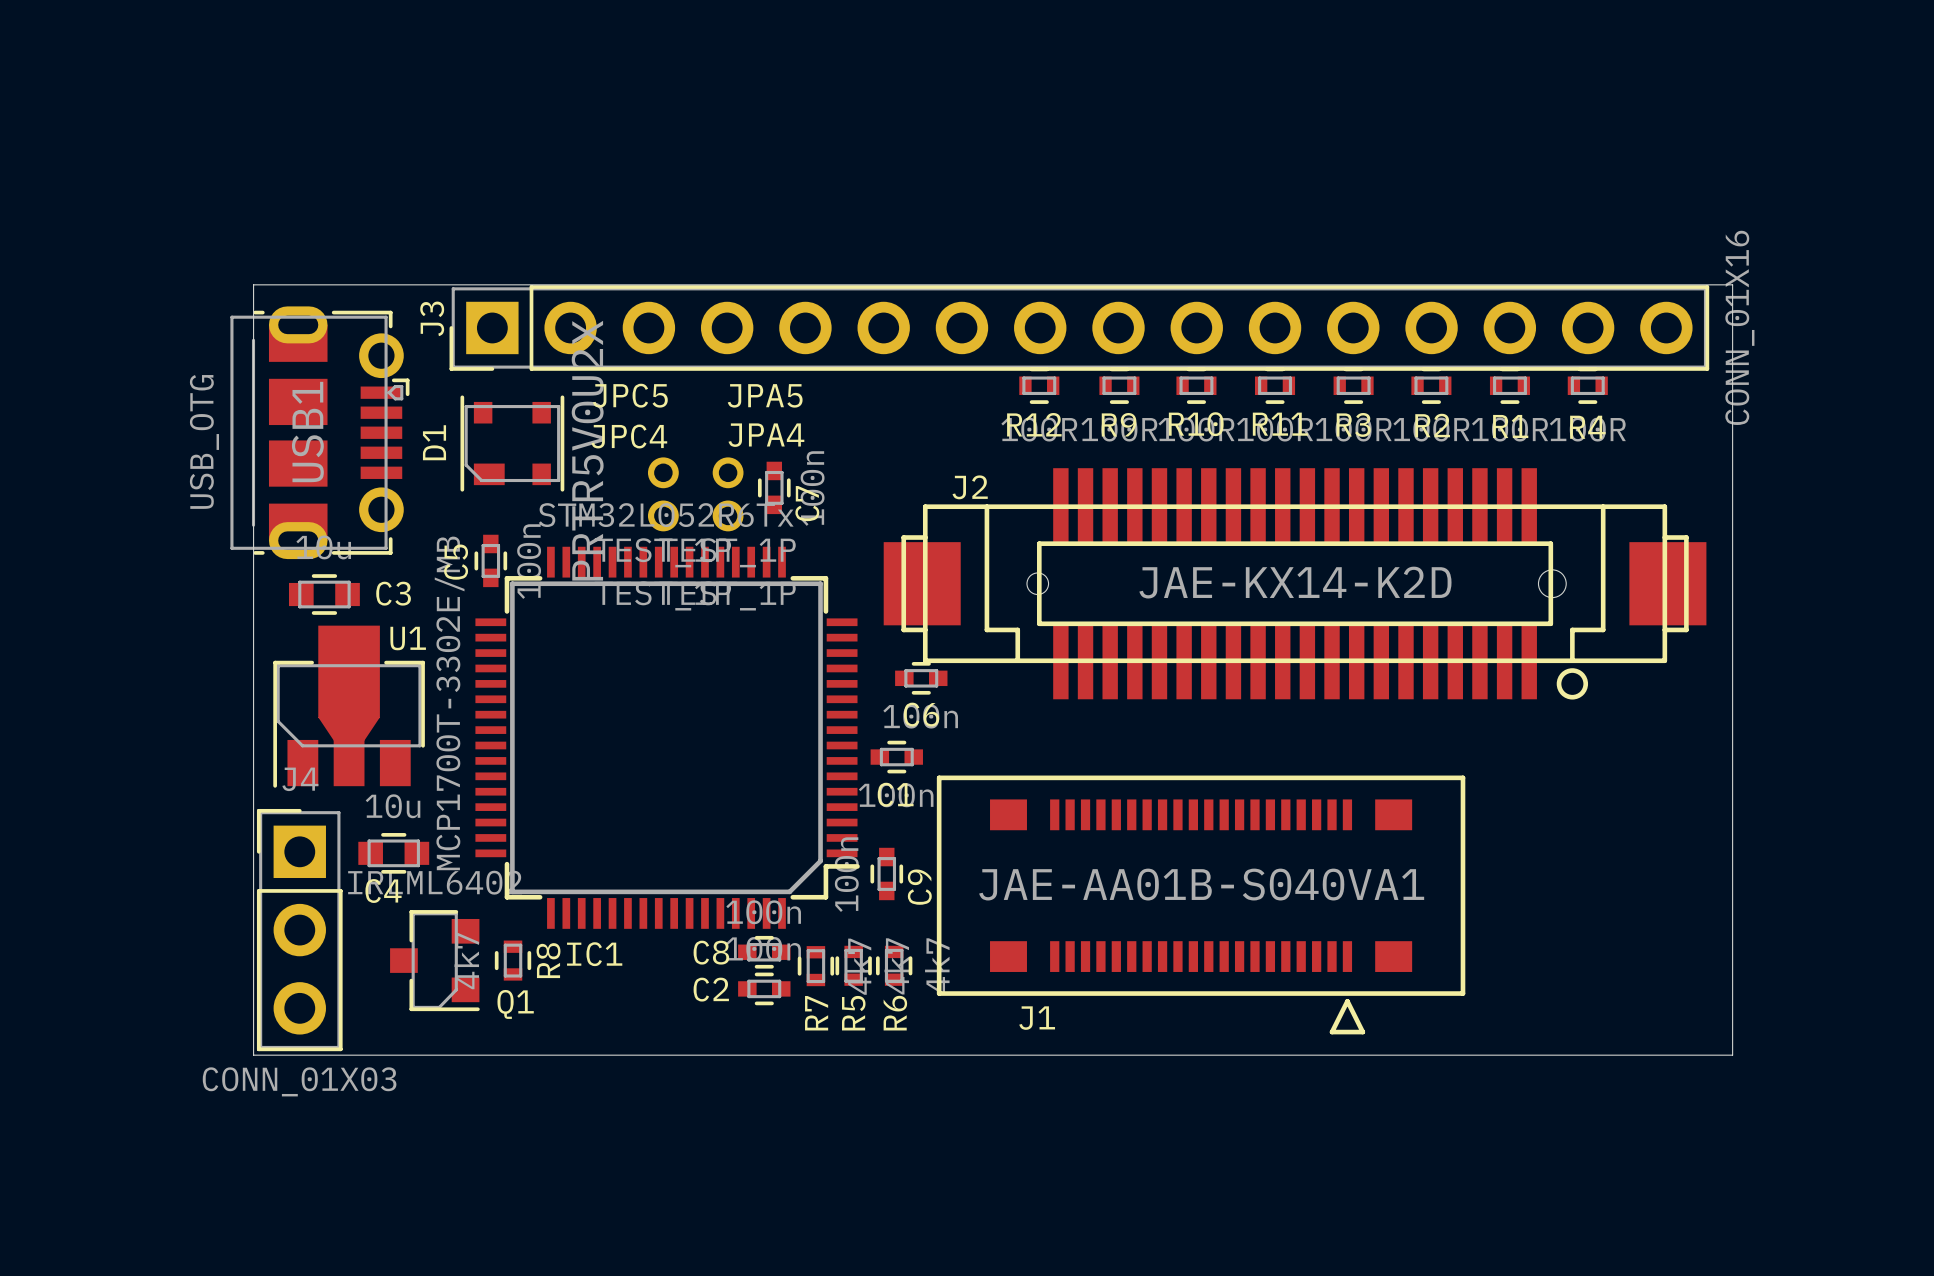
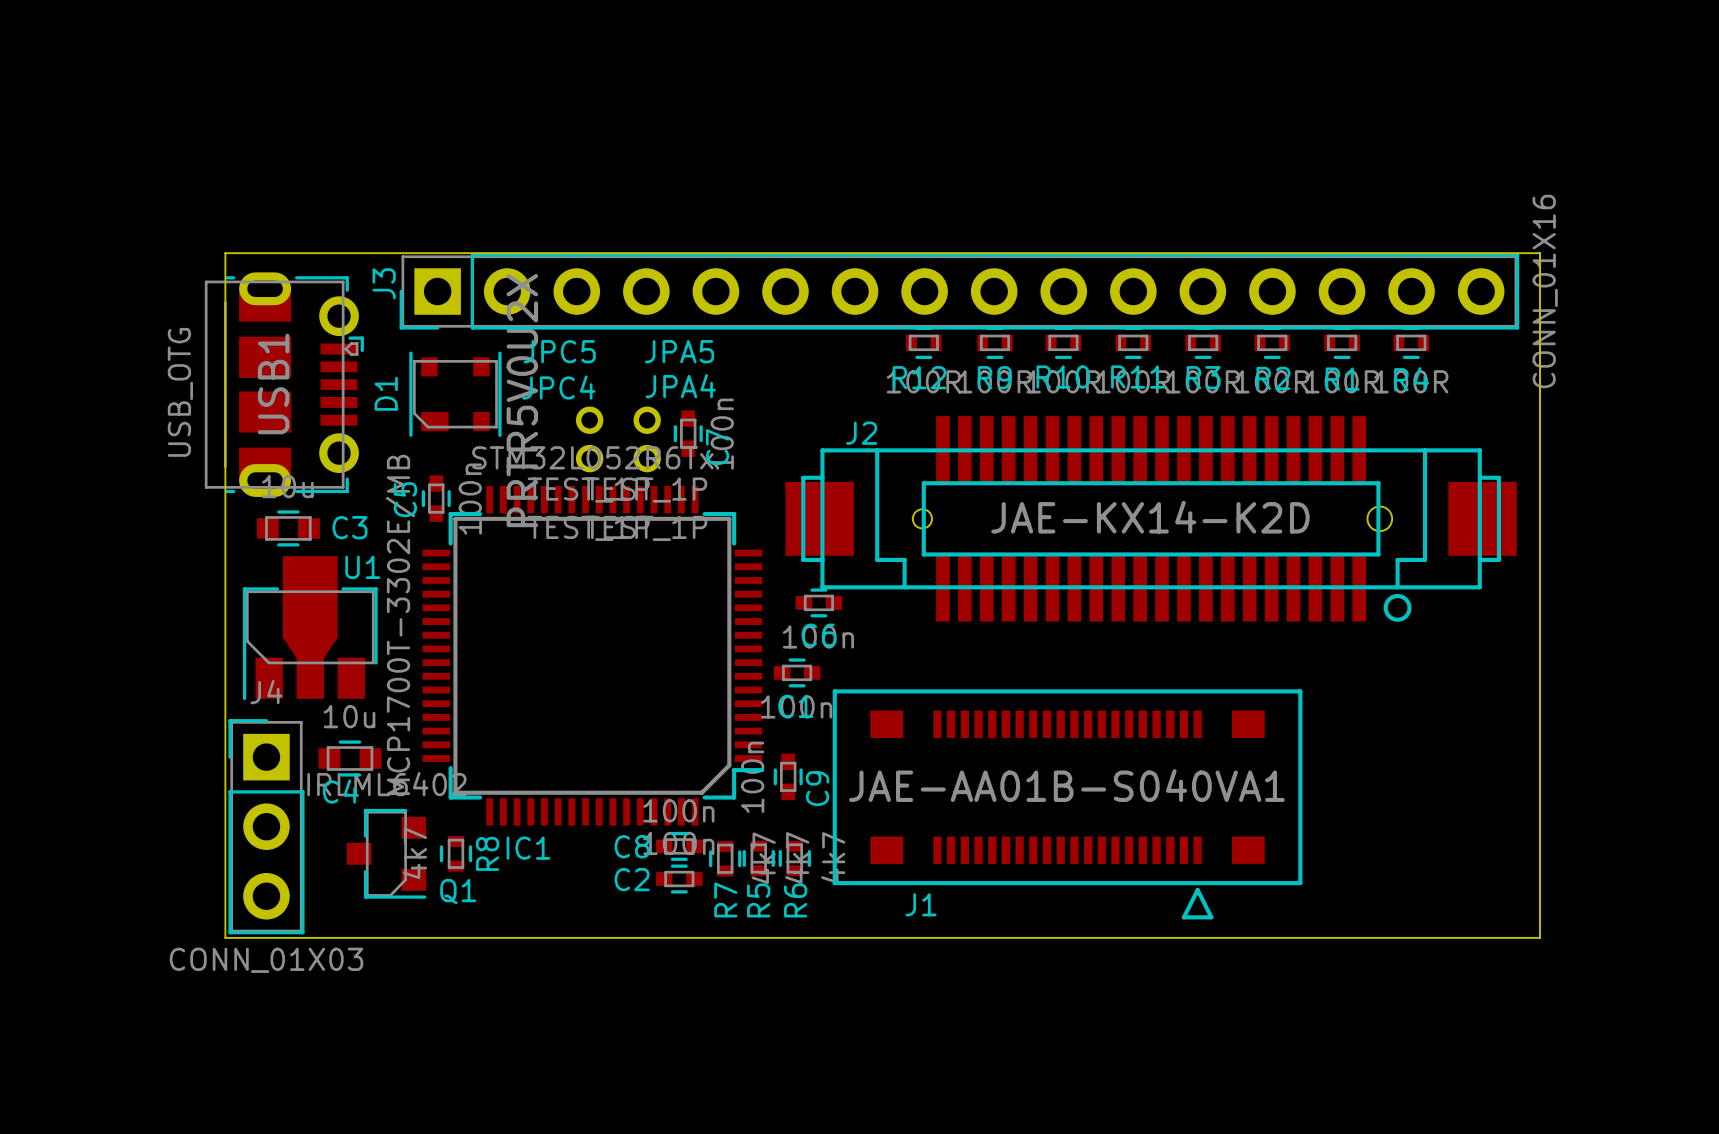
J1 footprint: [936, 775, 1466, 1035] -> [832, 689, 1303, 920]

